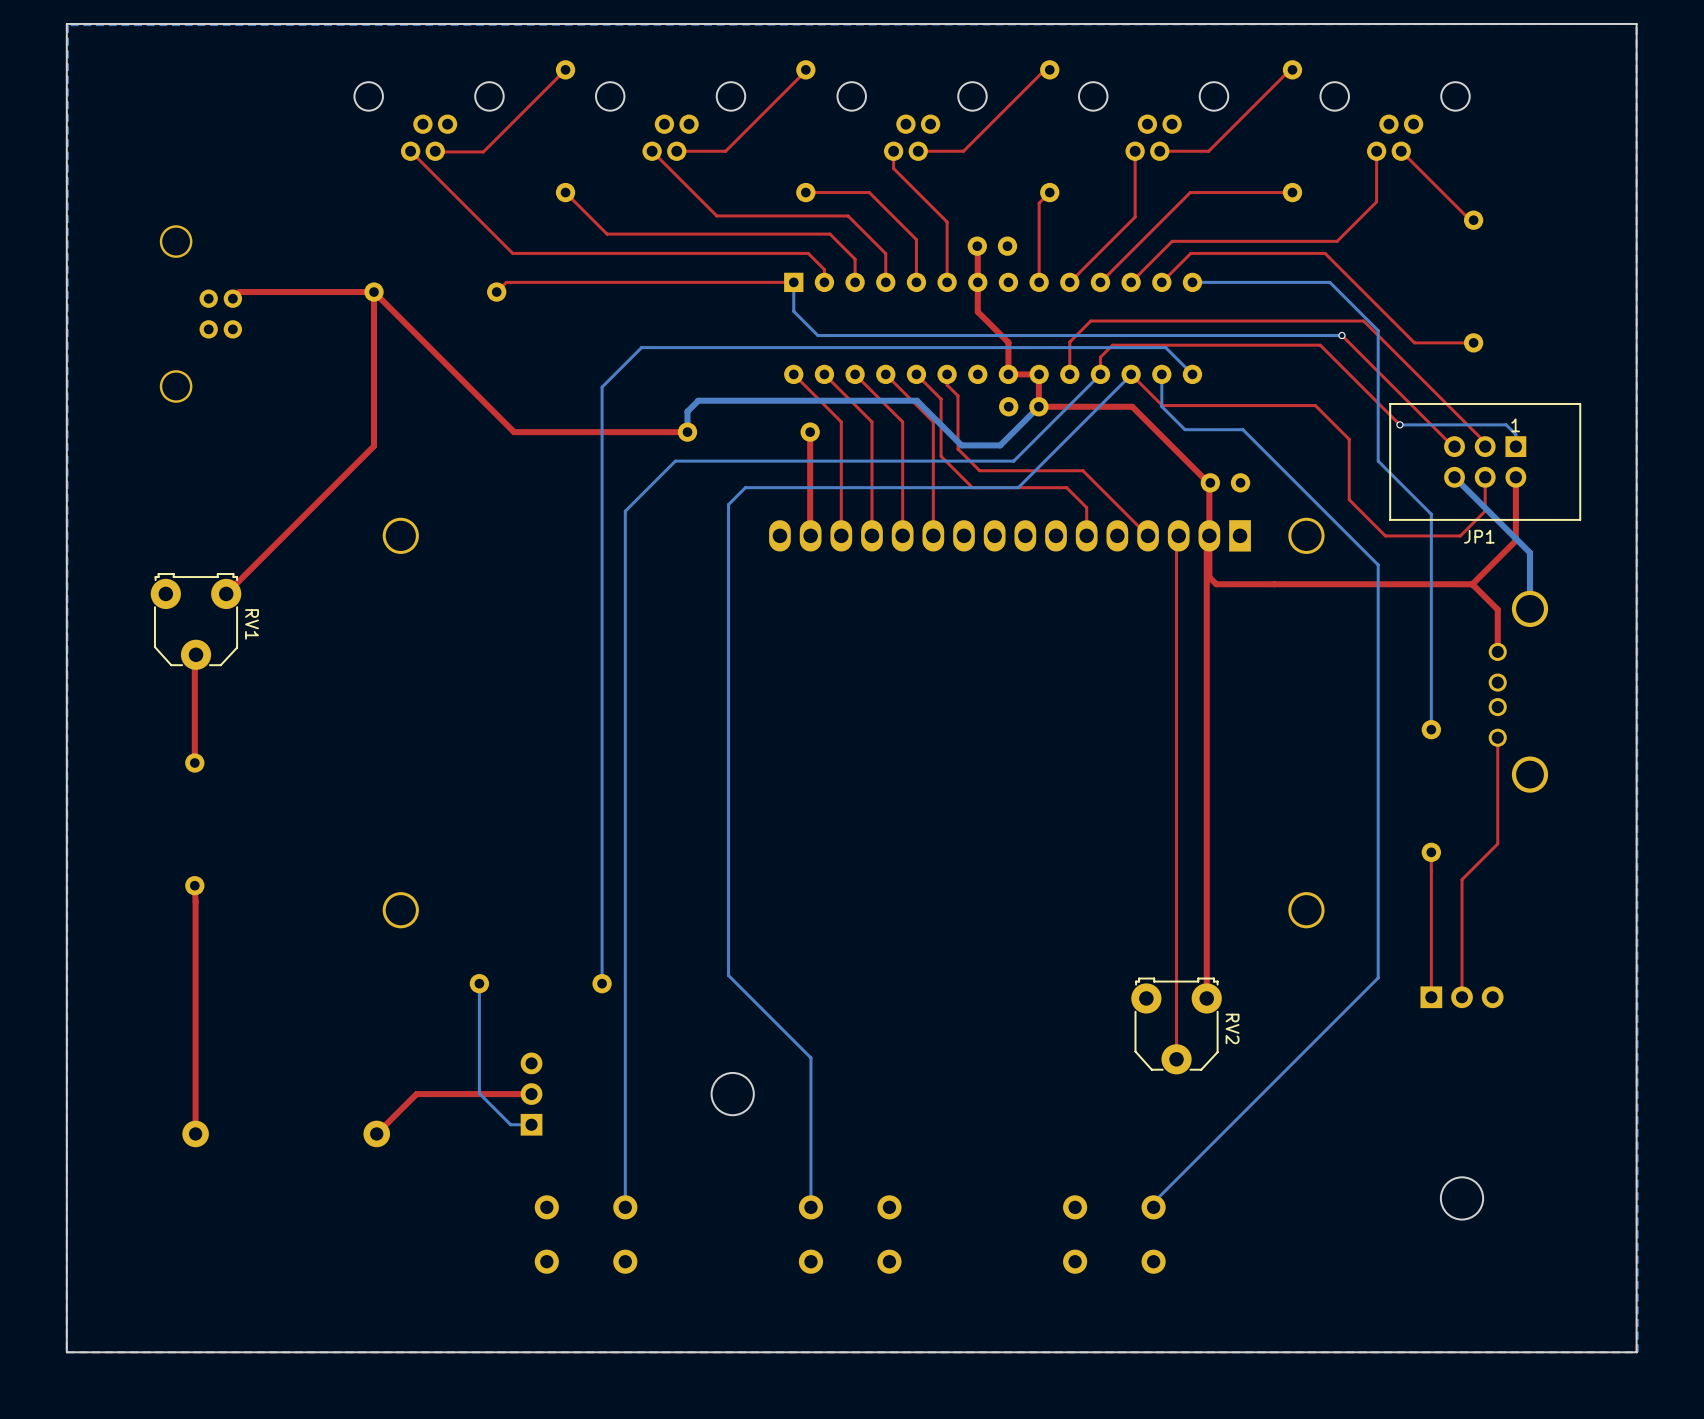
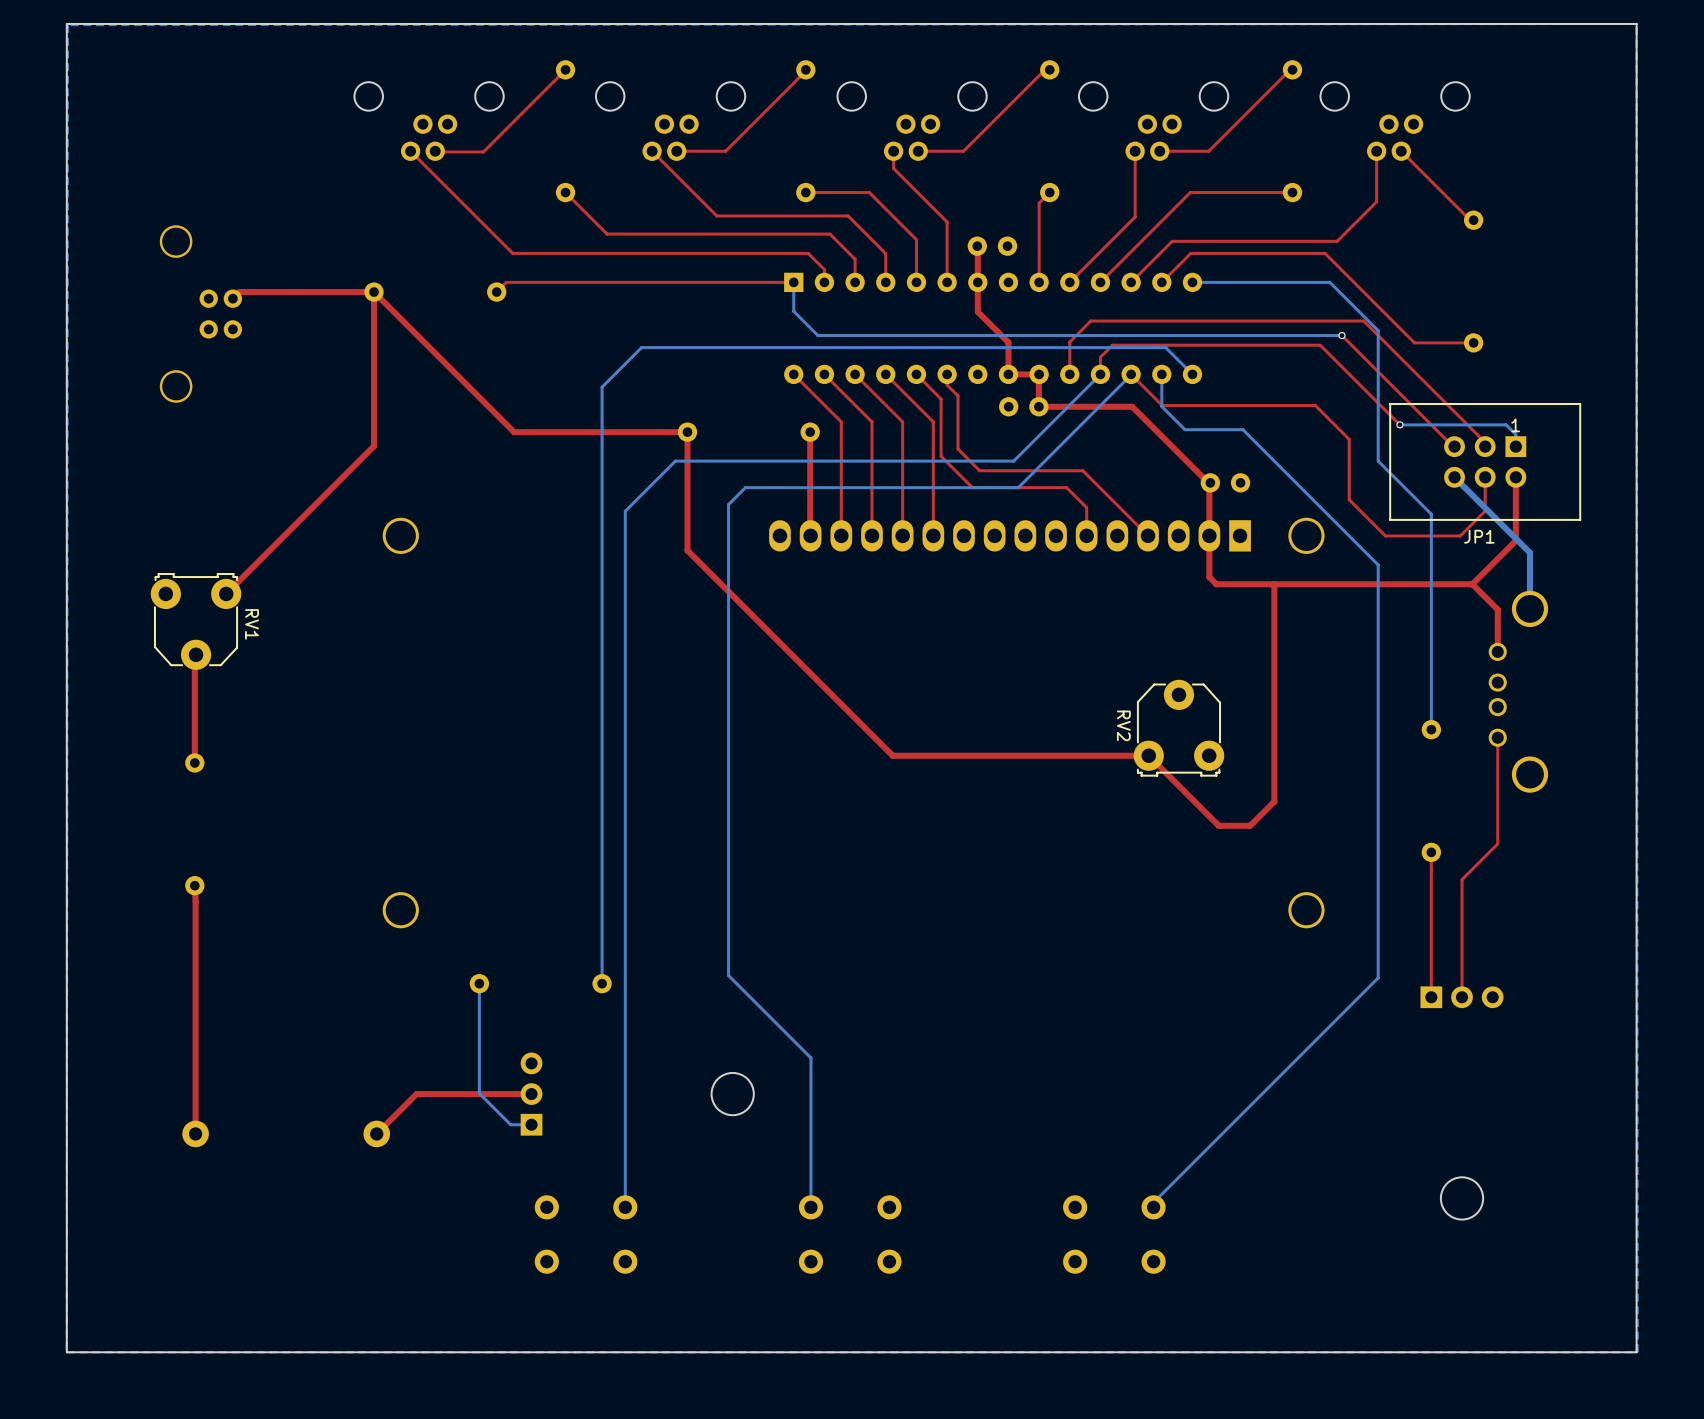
bottom track: (1038, 406) (1000, 445) (961, 445) (916, 400) (698, 400) (687, 411) (687, 432) -> none
top track: none -> (687, 432) (687, 550) (892, 755) (1148, 755) (1218, 825) (1250, 825) (1274, 801) (1274, 584)
top track: (1209, 535) (1206, 538) (1206, 998) -> none
top track: (1176, 538) (1176, 1059) -> none
RV2 rotation: 0° (1176, 1026) -> 180° (1178, 728)
RV2 position: (1176, 1026) -> (1178, 728)

